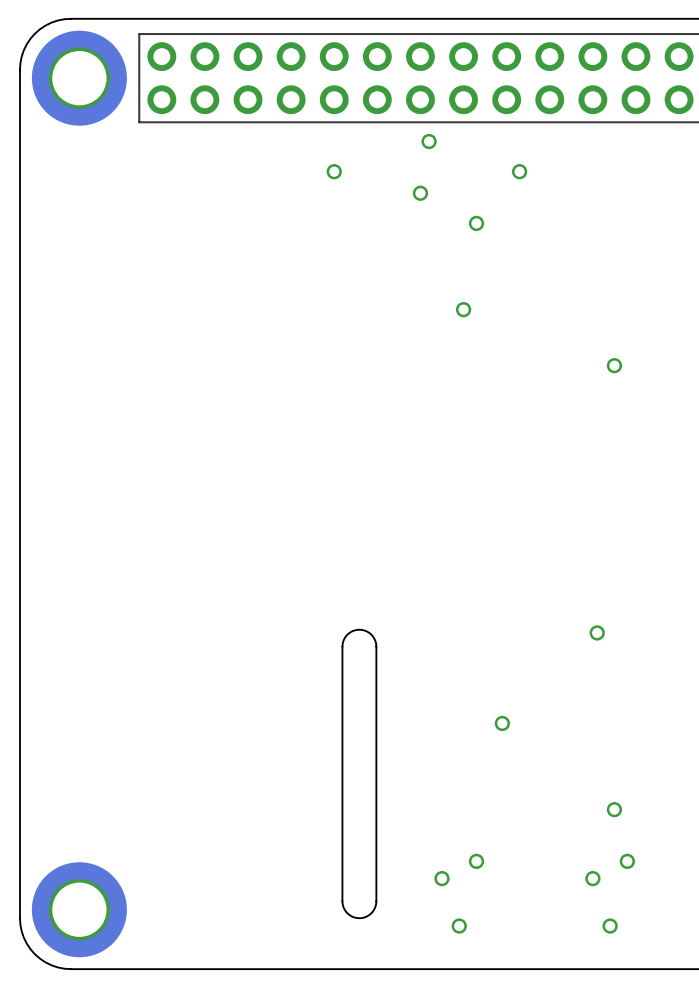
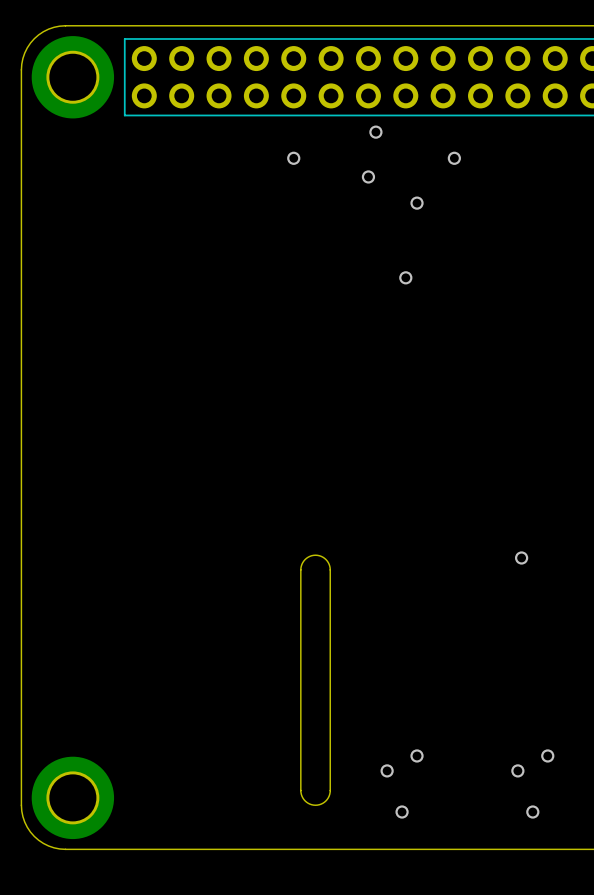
via: (614, 365) -> none
via: (502, 723) -> none
via: (614, 809) -> none

